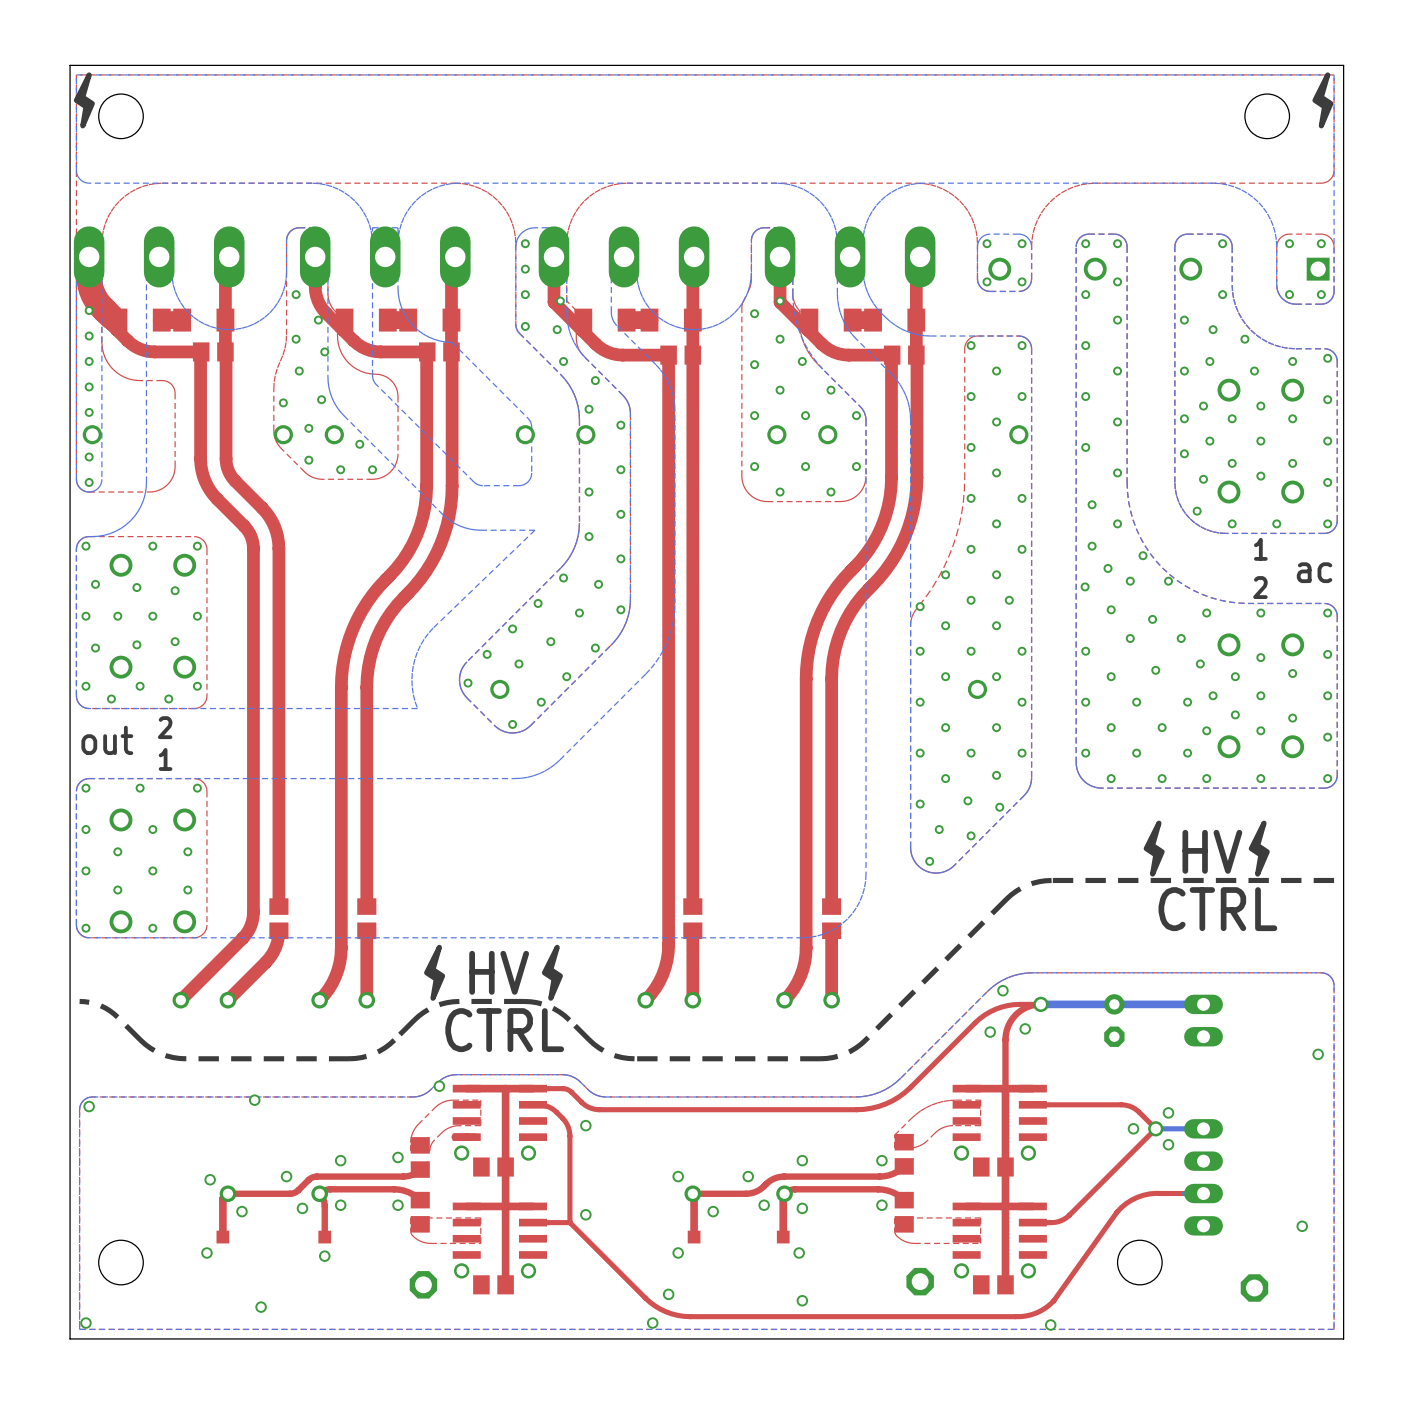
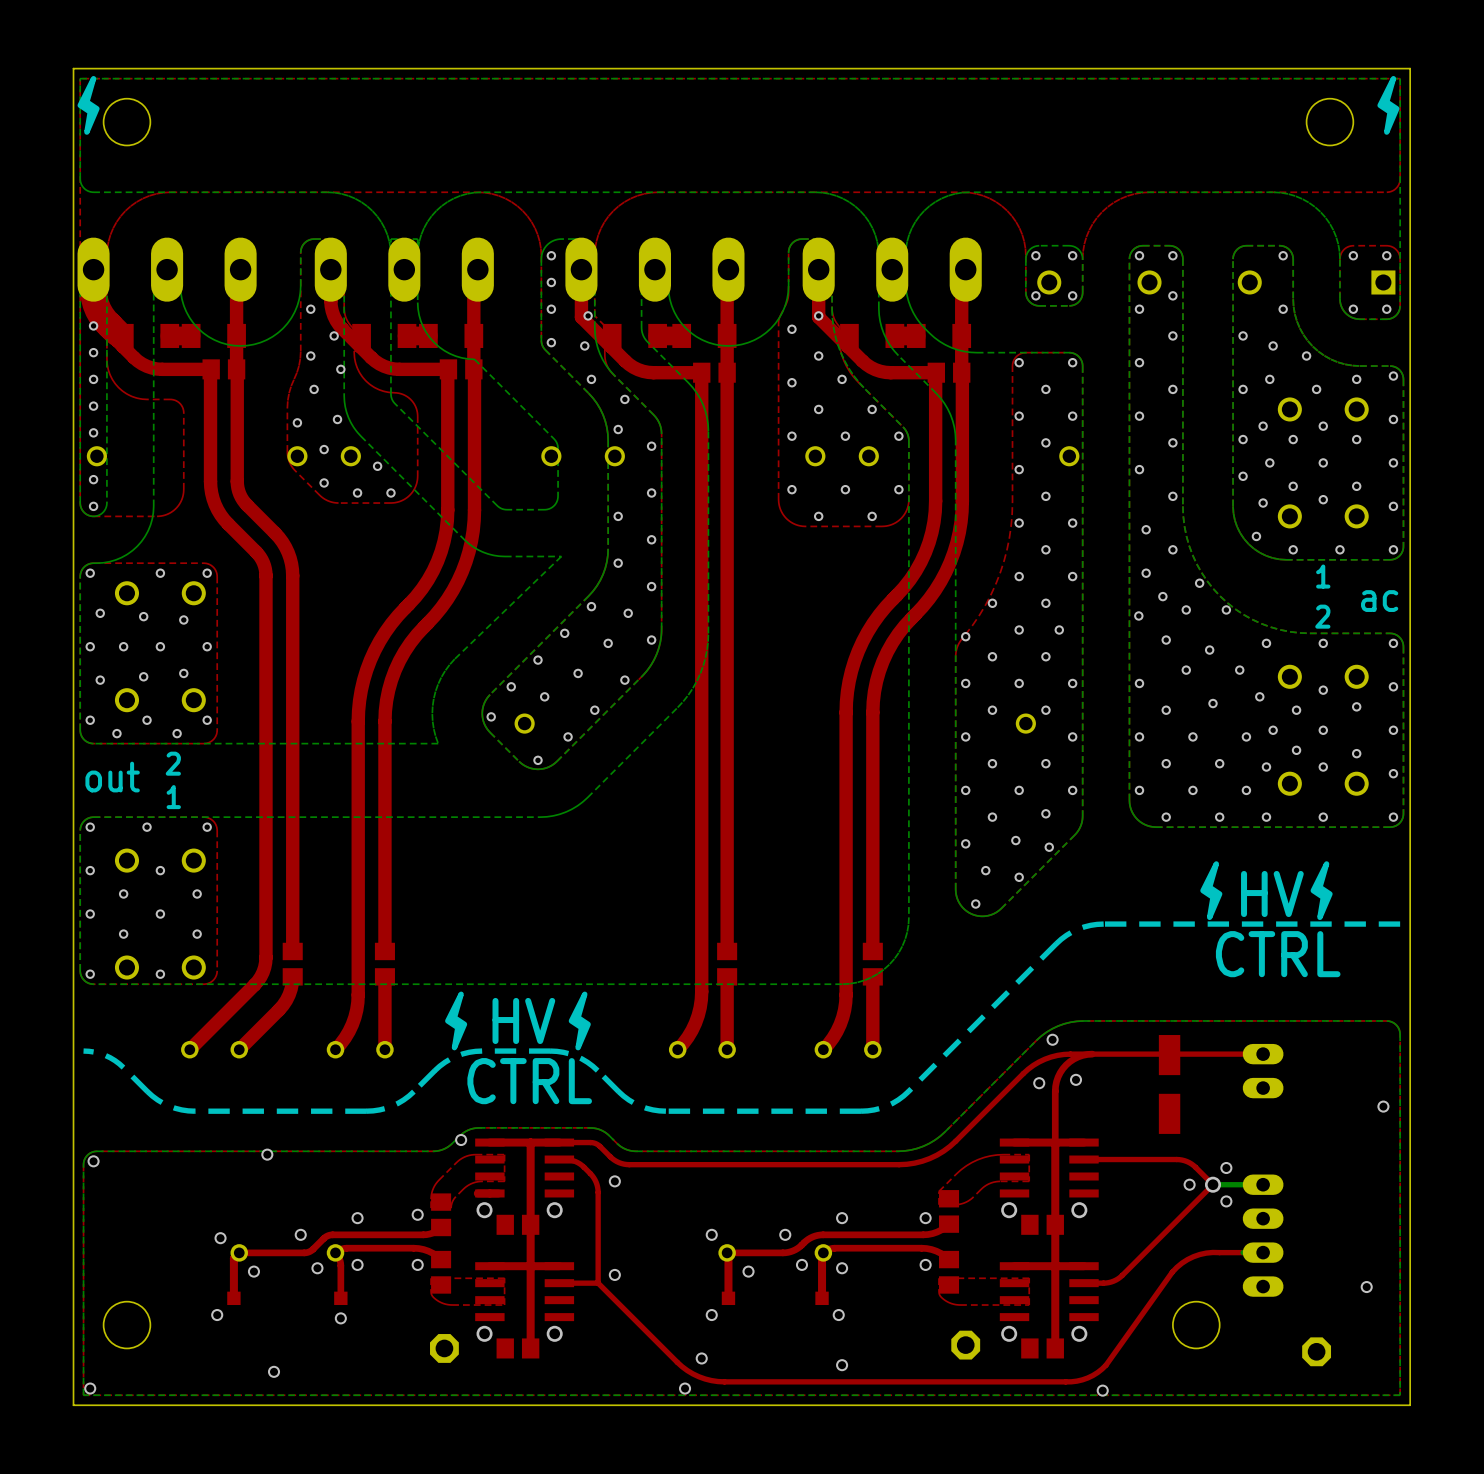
part footprint: [1104, 994, 1125, 1047] -> [1158, 1035, 1181, 1134]
via: (1040, 1004) -> none
top track: none -> (1263, 1054) (1092, 1054)
bottom track: (1203, 1004) (1040, 1004) -> none

